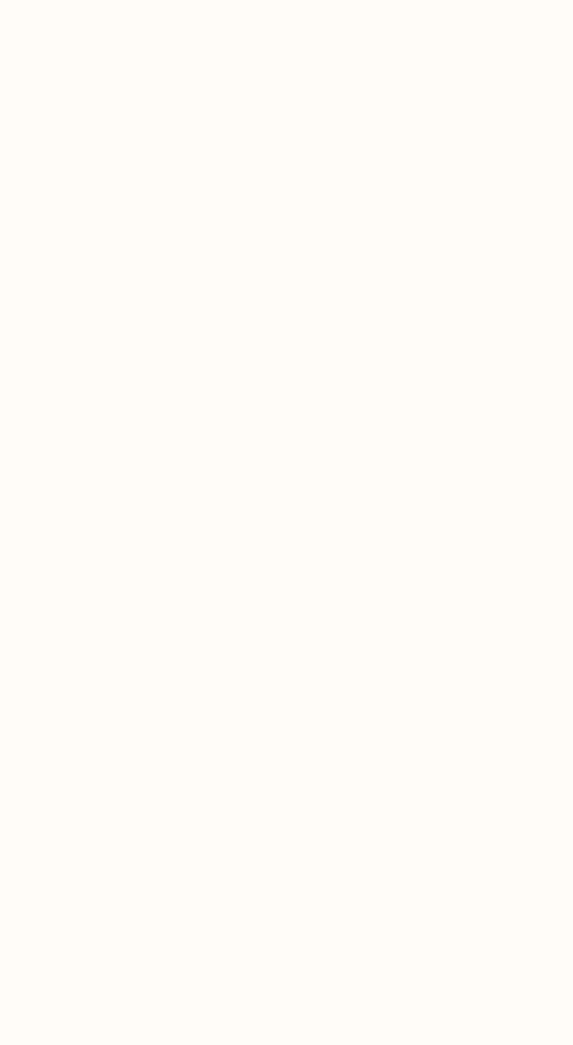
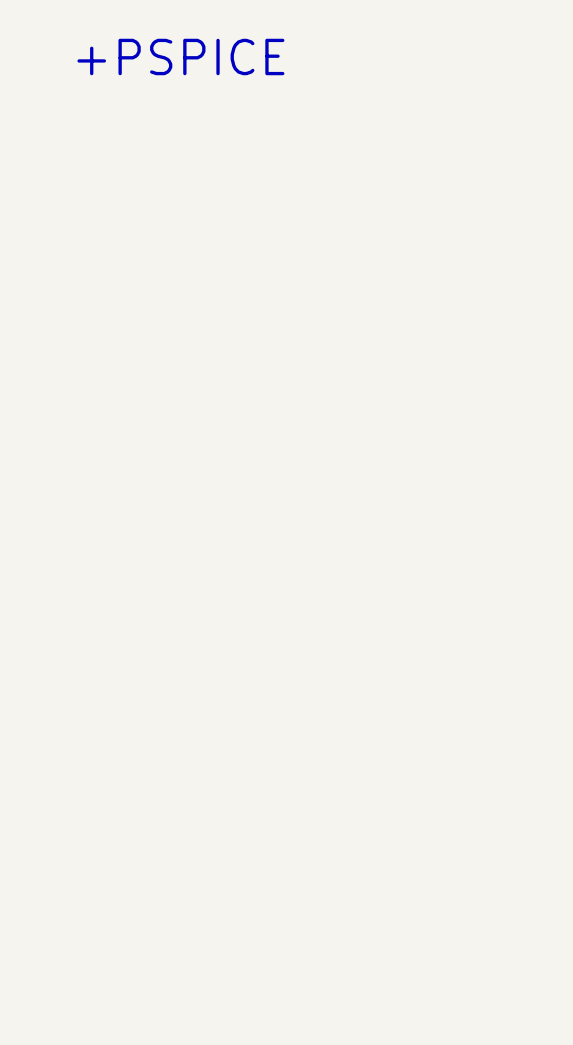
text: none -> +PSPICE (180, 56)

